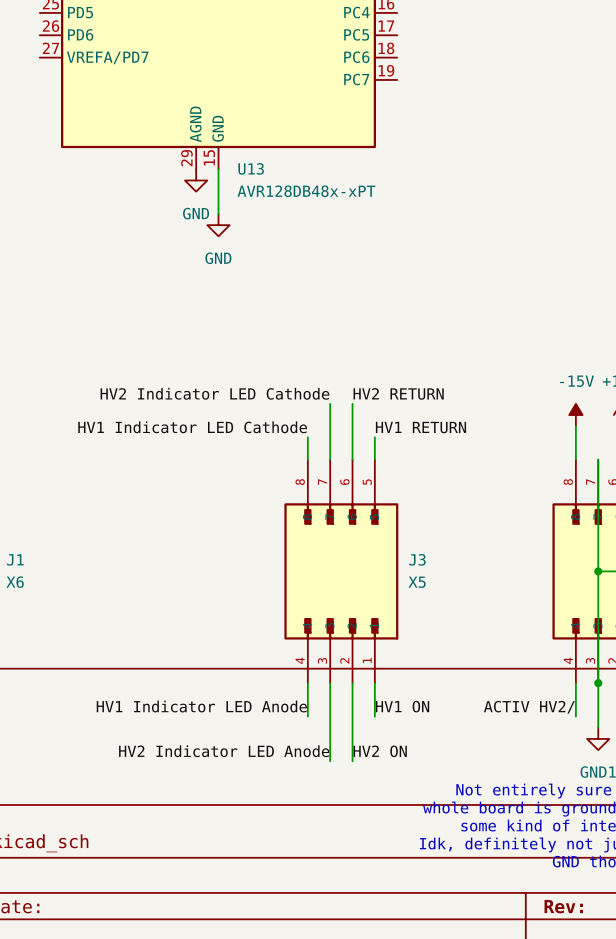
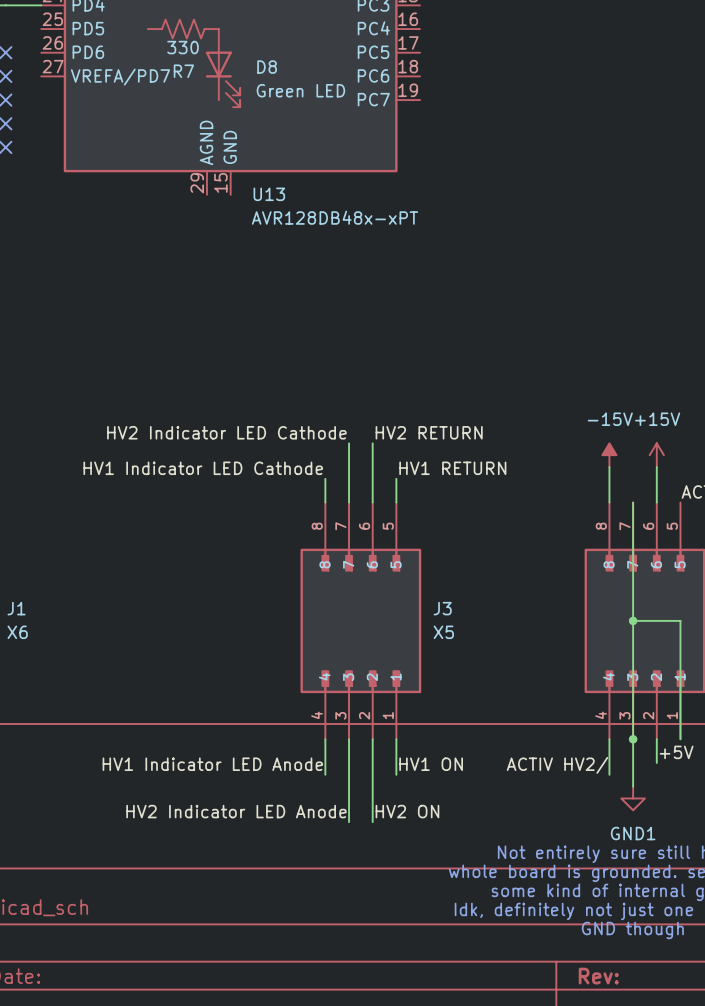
R7: none -> 330 (183, 29)
no-connect mark: none -> (5, 52)
D8: none -> Green LED (222, 68)
no-connect mark: none -> (5, 76)
no-connect mark: none -> (5, 100)
no-connect mark: none -> (5, 123)
no-connect mark: none -> (5, 147)
wire: (218, 169) (218, 213) -> none
power symbol: GND (196, 180) -> none
power symbol: GND (218, 225) -> none

